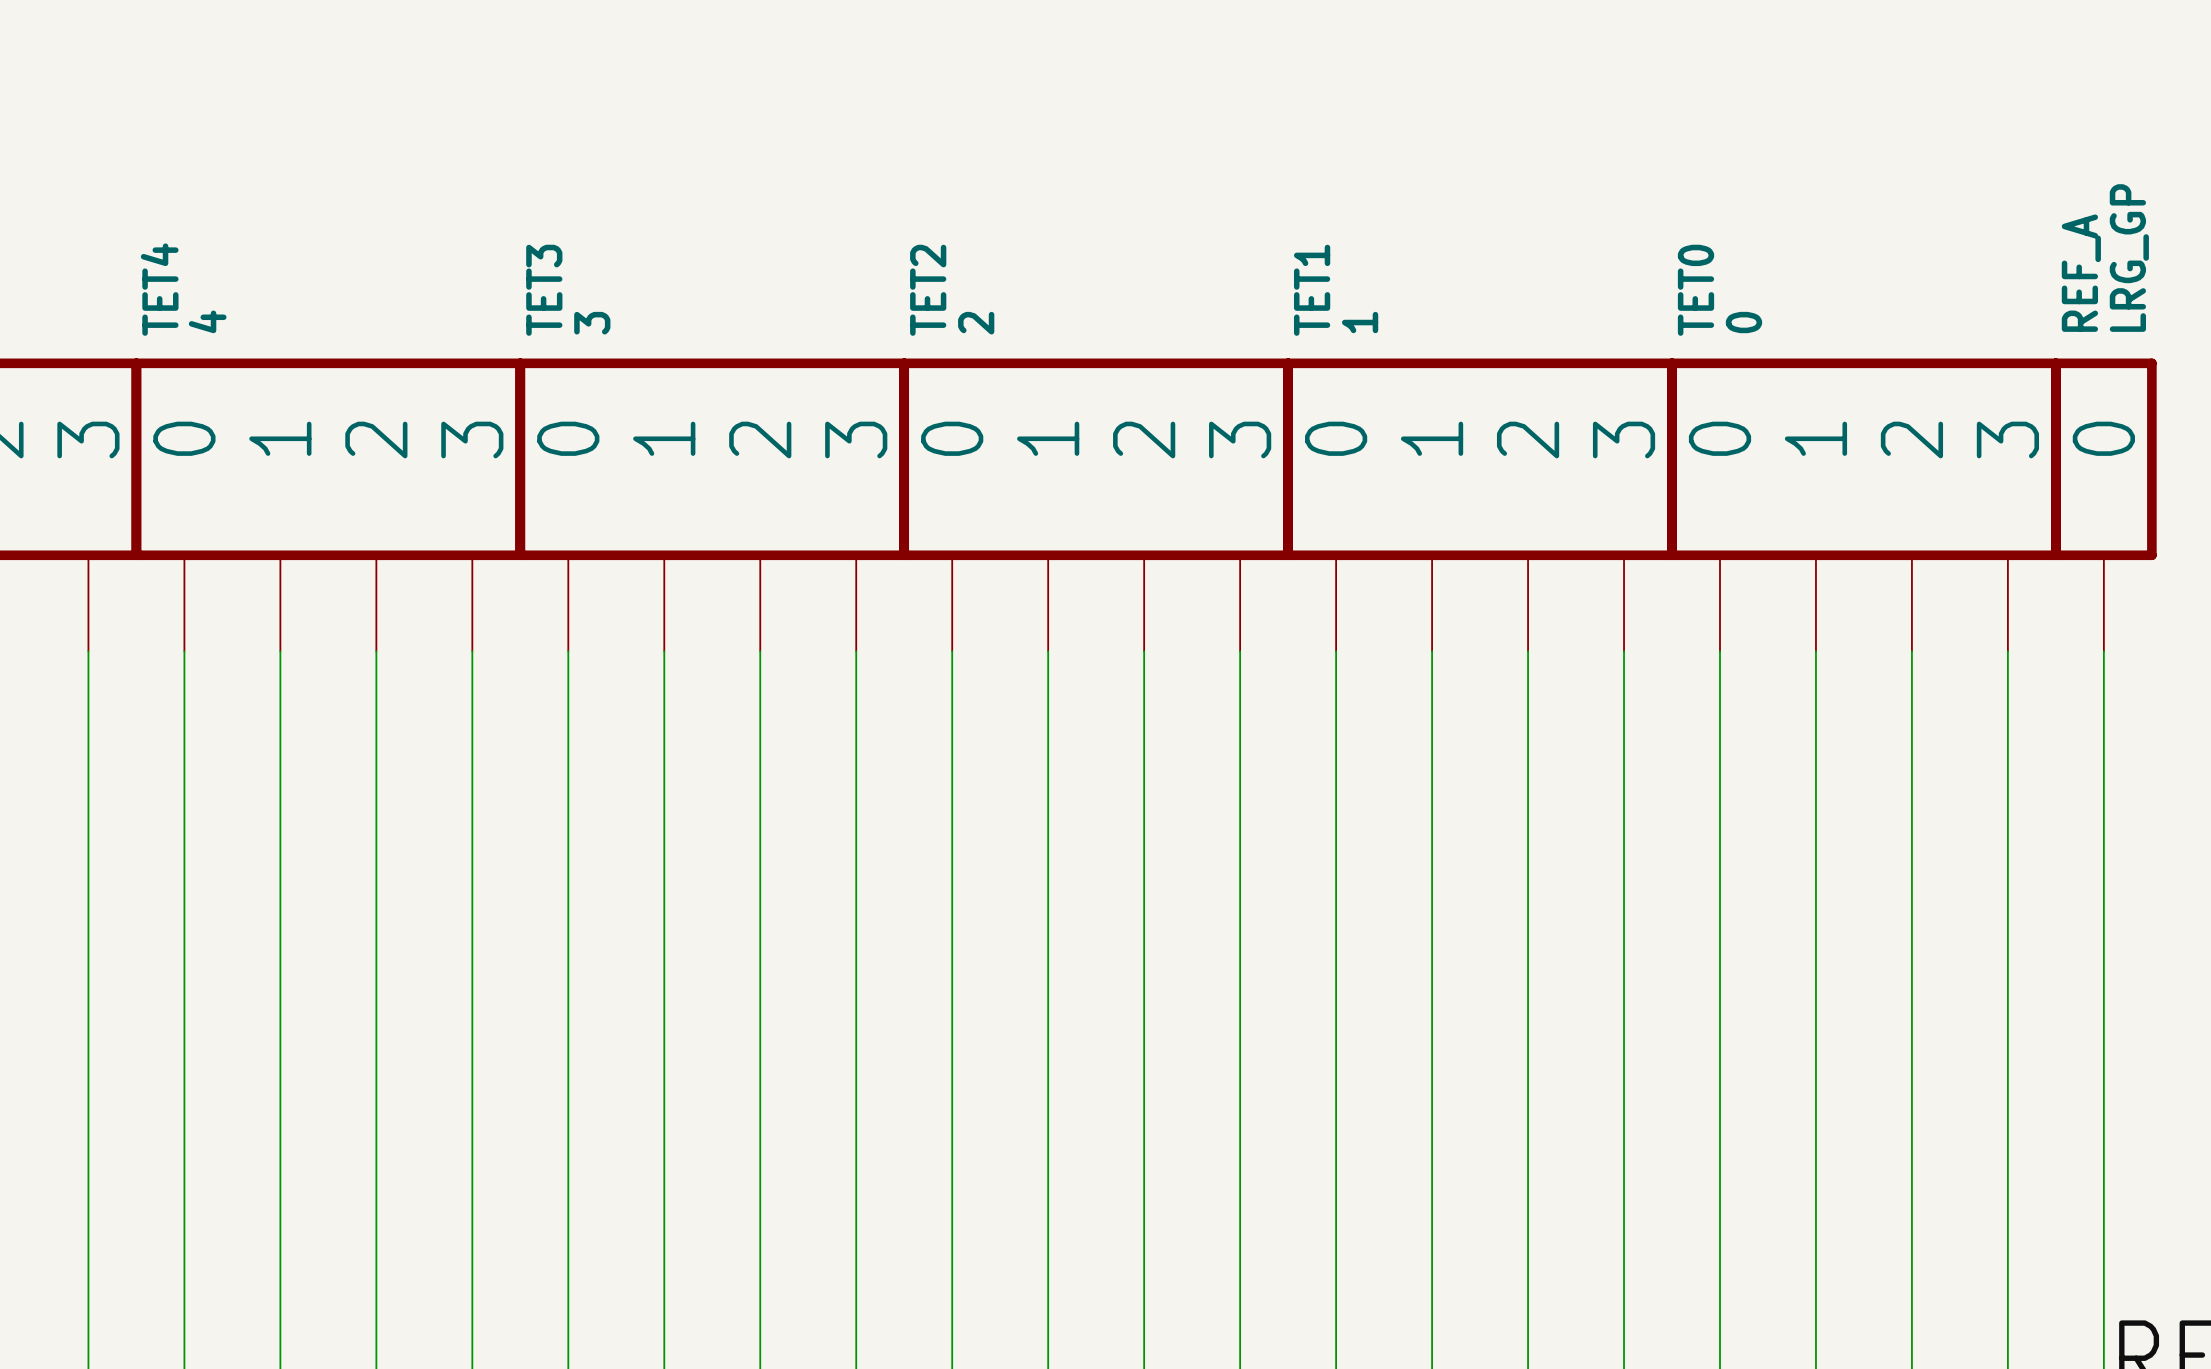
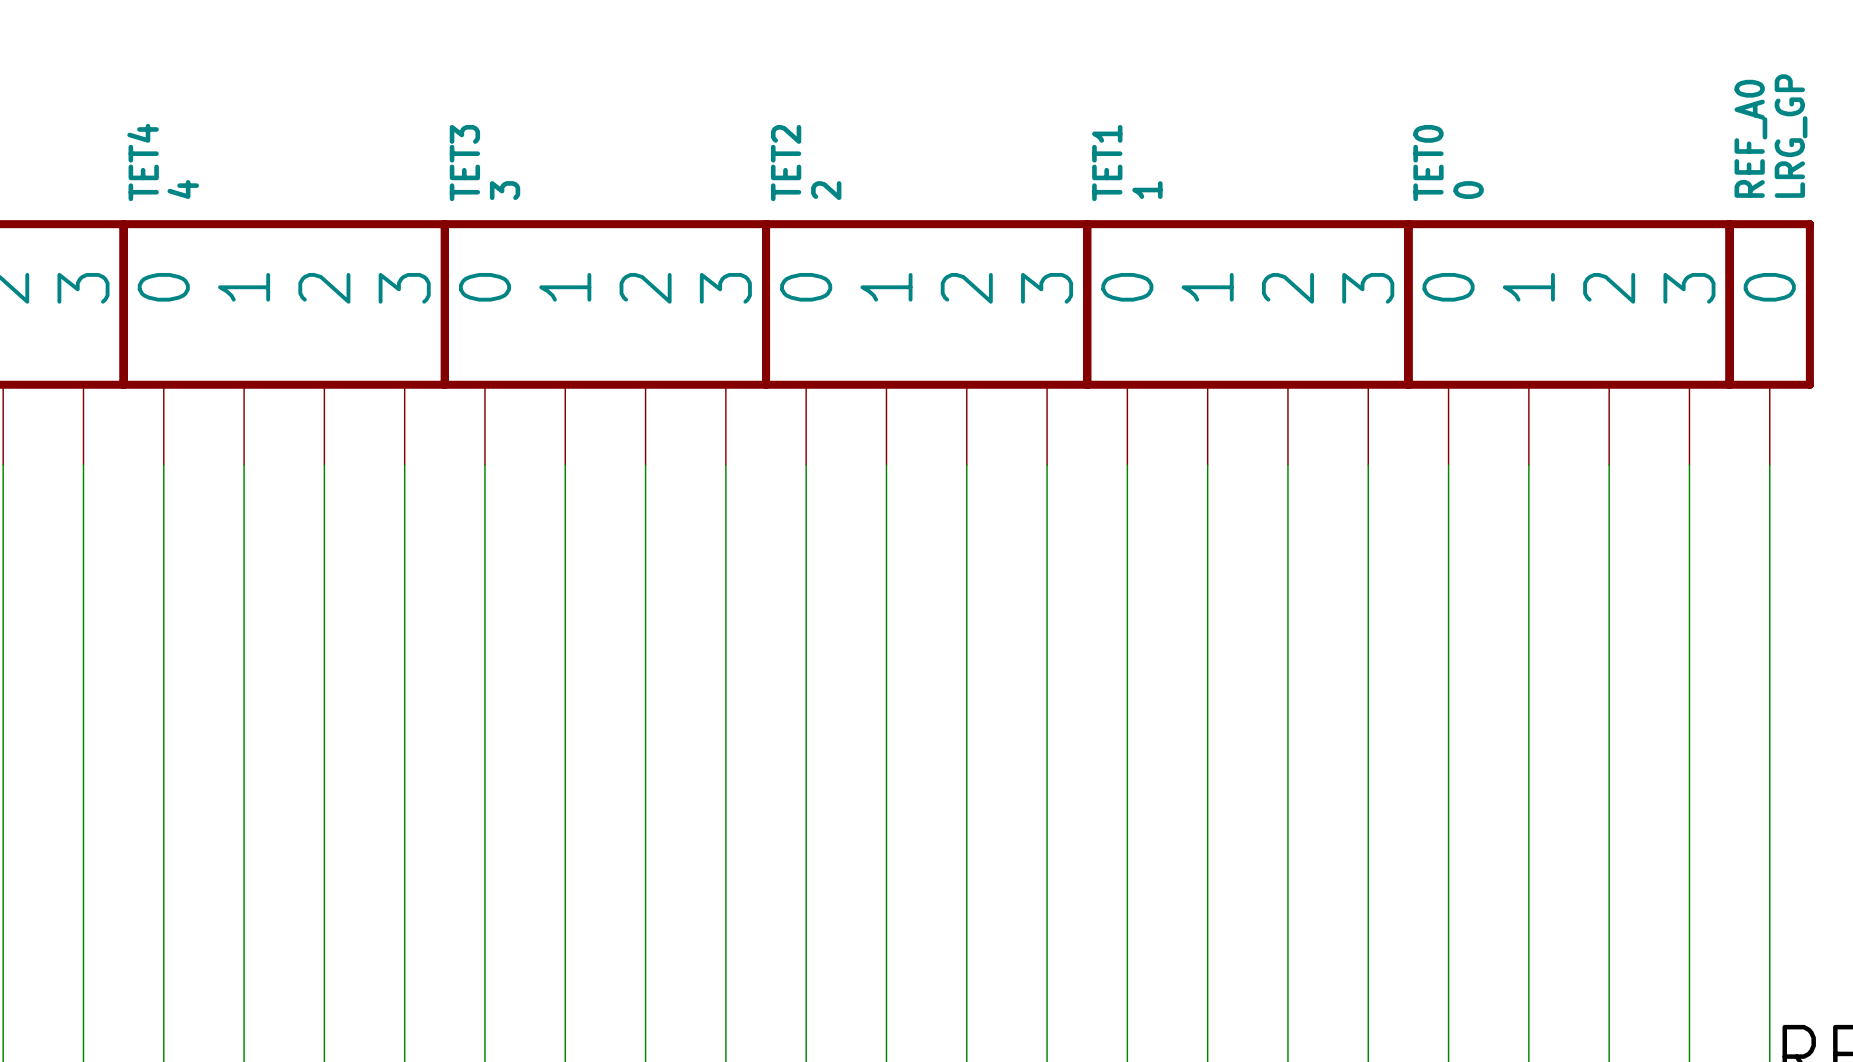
REF_A name: REF_A (2081, 273) -> REF_A0 (1750, 138)

